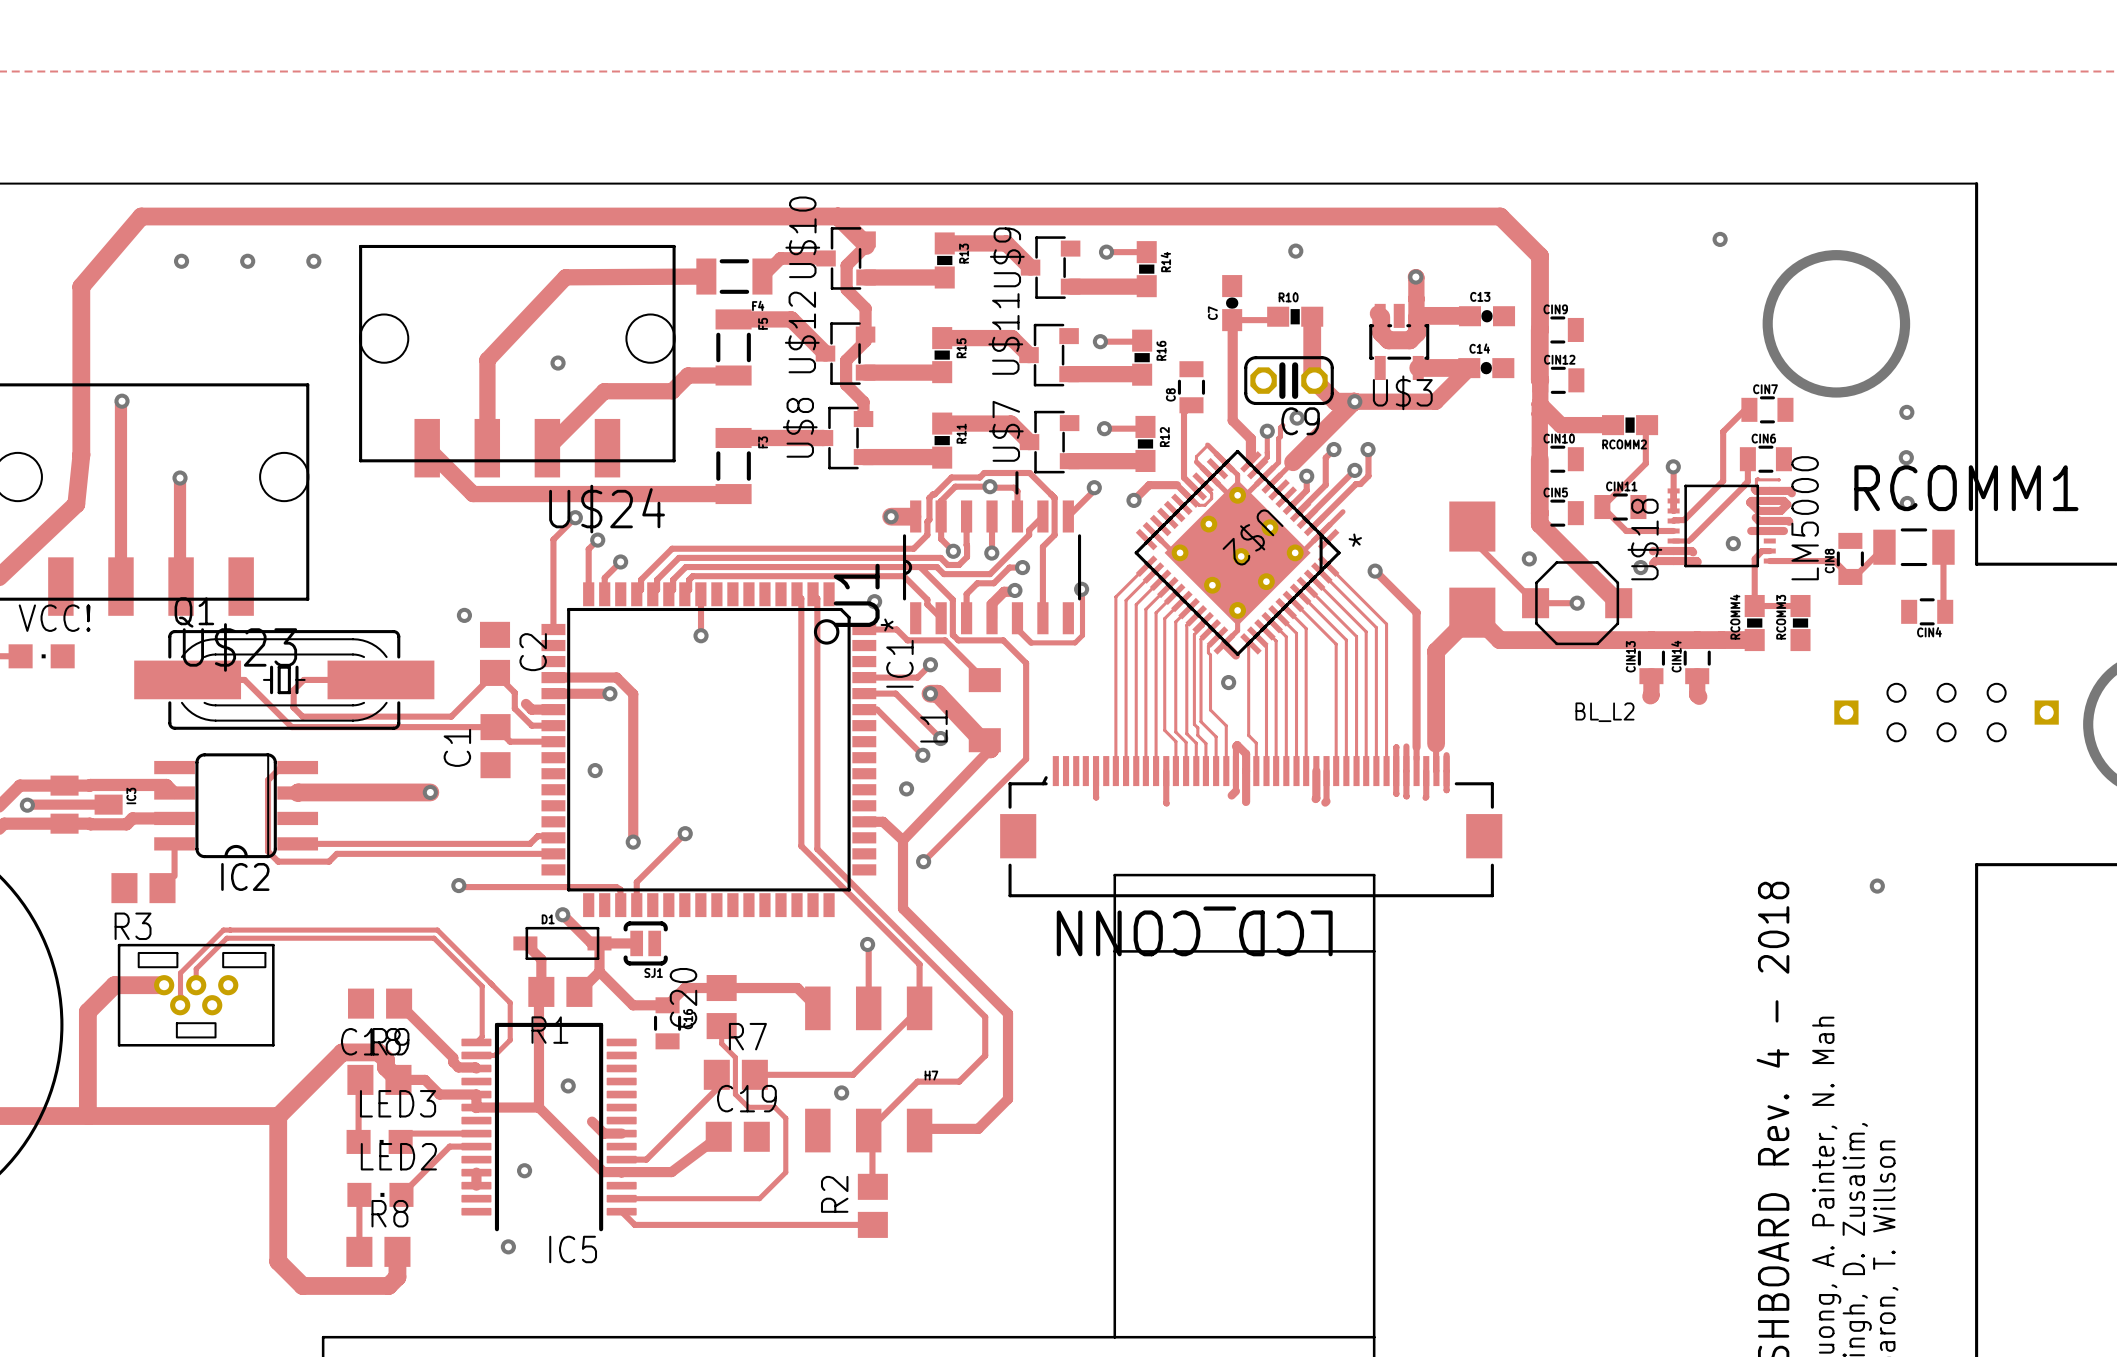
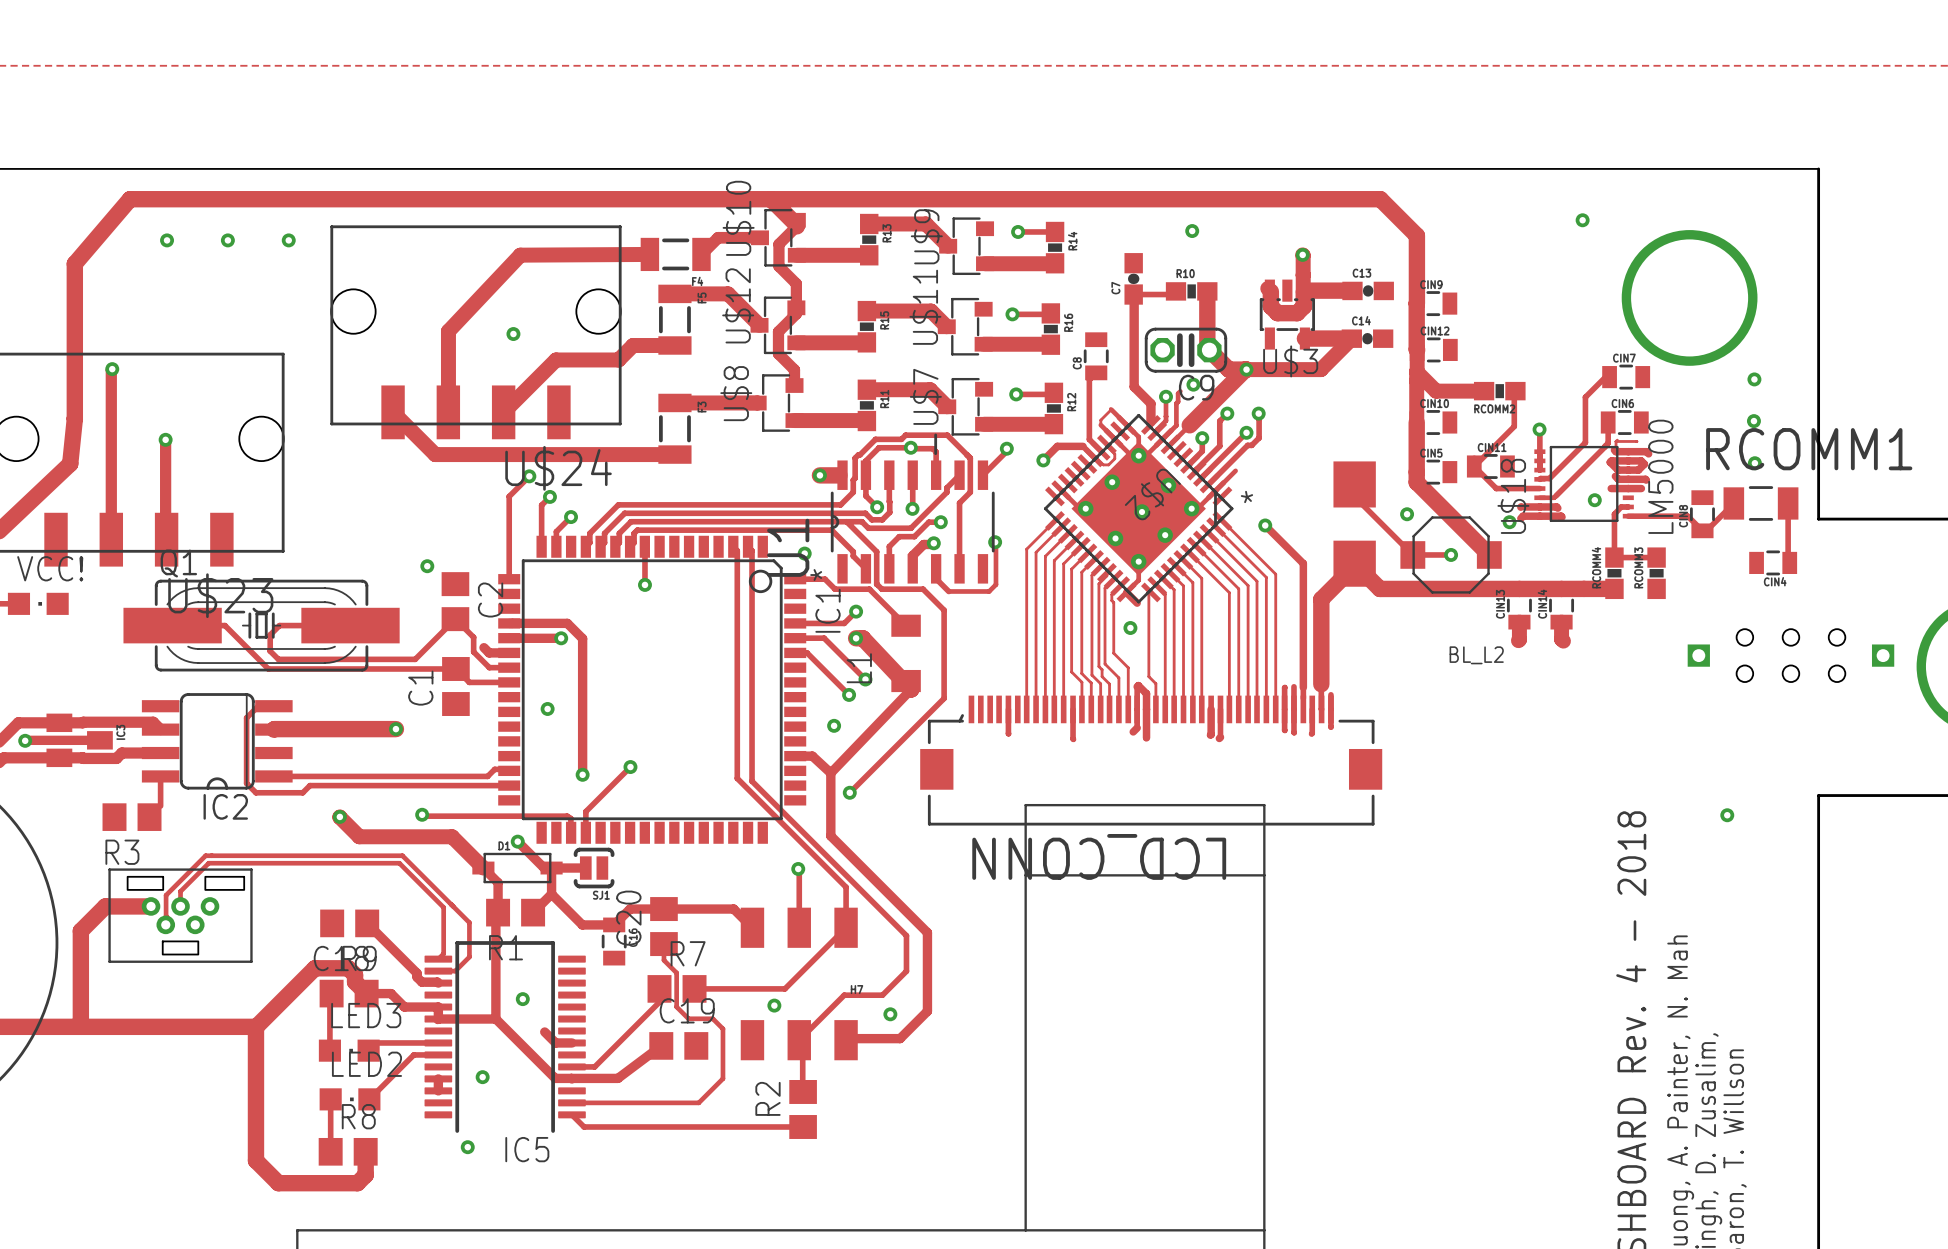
track: none -> (339, 816) (359, 836) (452, 836) (483, 868)
via: none -> (339, 816)
via: none -> (890, 1014)

